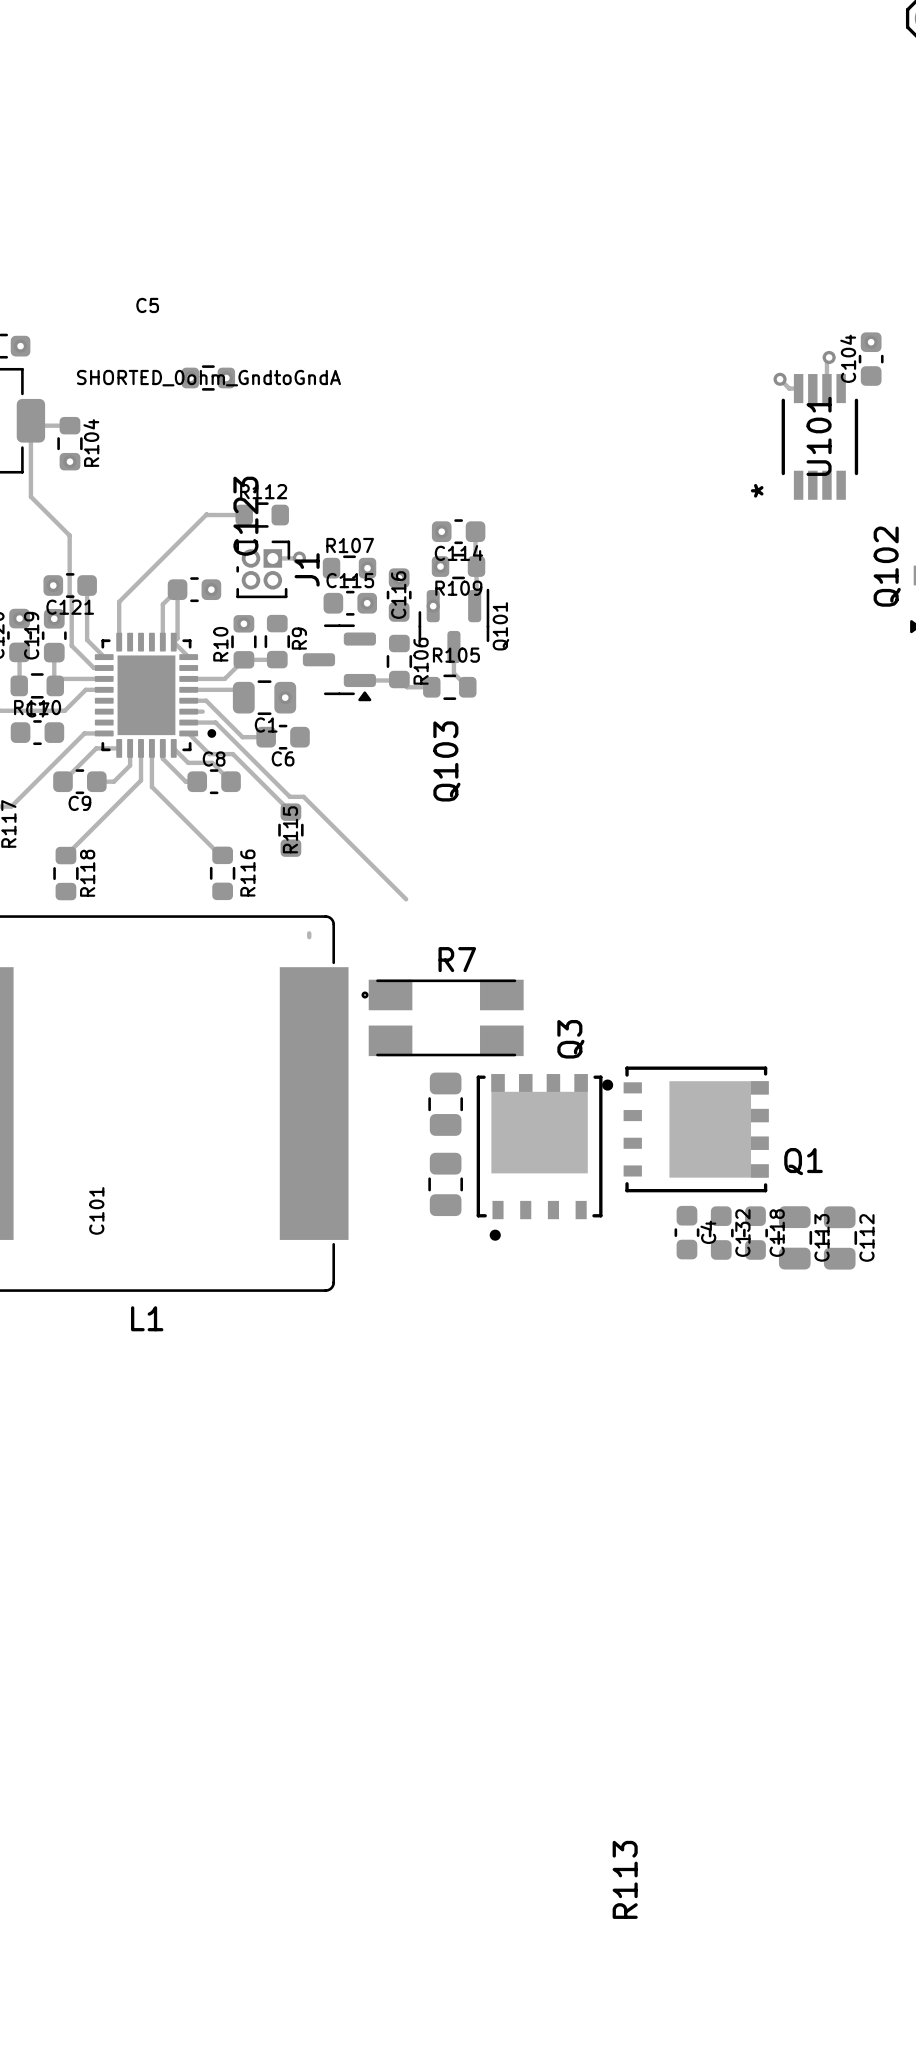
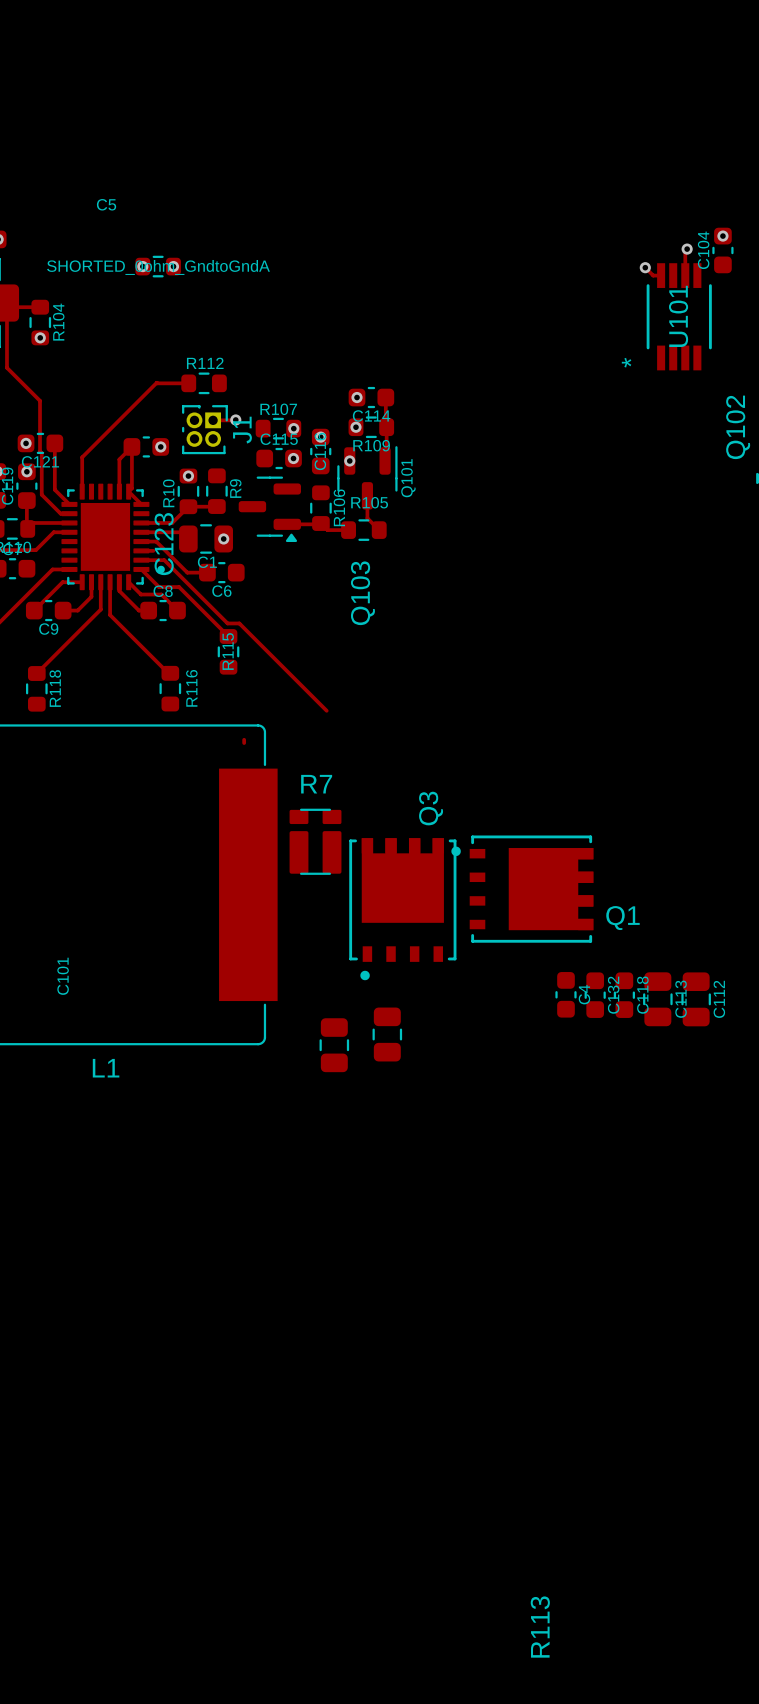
R7 footprint: [361, 979, 524, 1057] -> [289, 808, 342, 875]
C123 position: (445, 1104) -> (334, 1045)
Q1 position: (685, 1129) -> (522, 889)
Q3 position: (539, 1157) -> (402, 909)
R113 position: (445, 1184) -> (387, 1034)

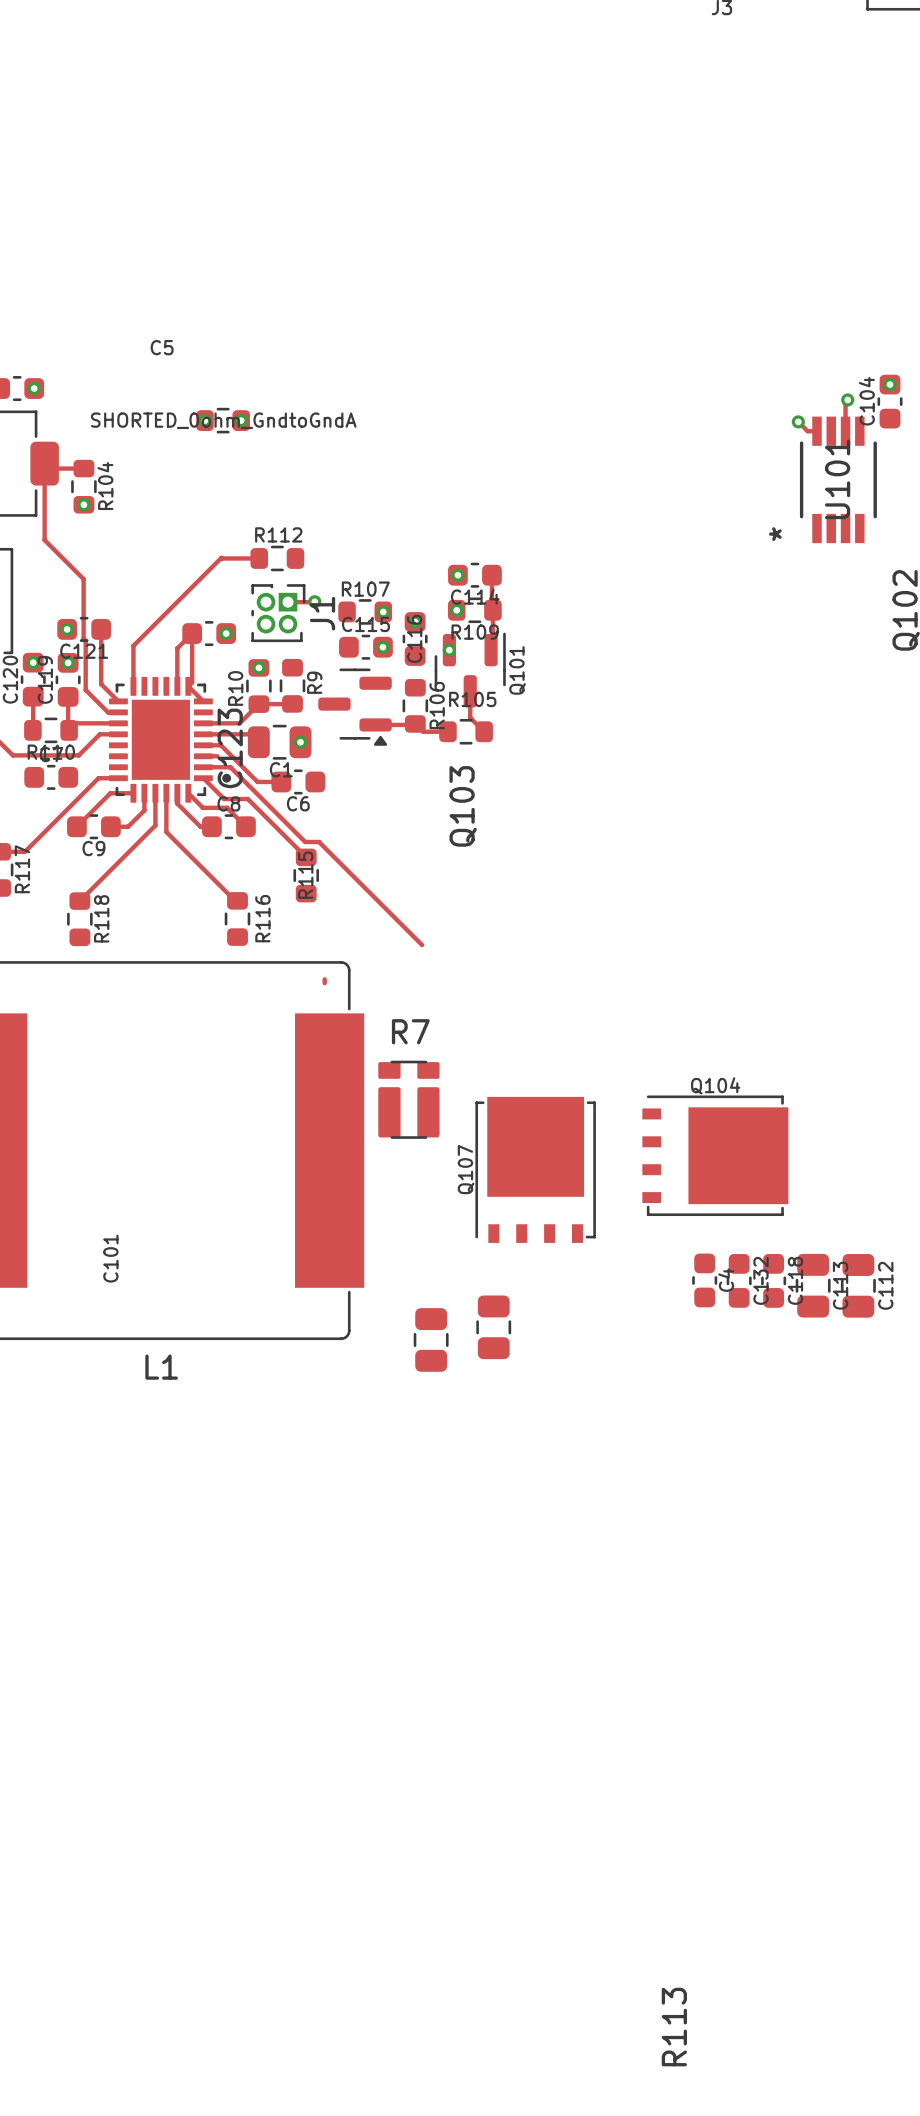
Q1: (522, 889) -> none
Q104: none -> (715, 1155)
Q107: none -> (535, 1169)
Q3: (402, 909) -> none

